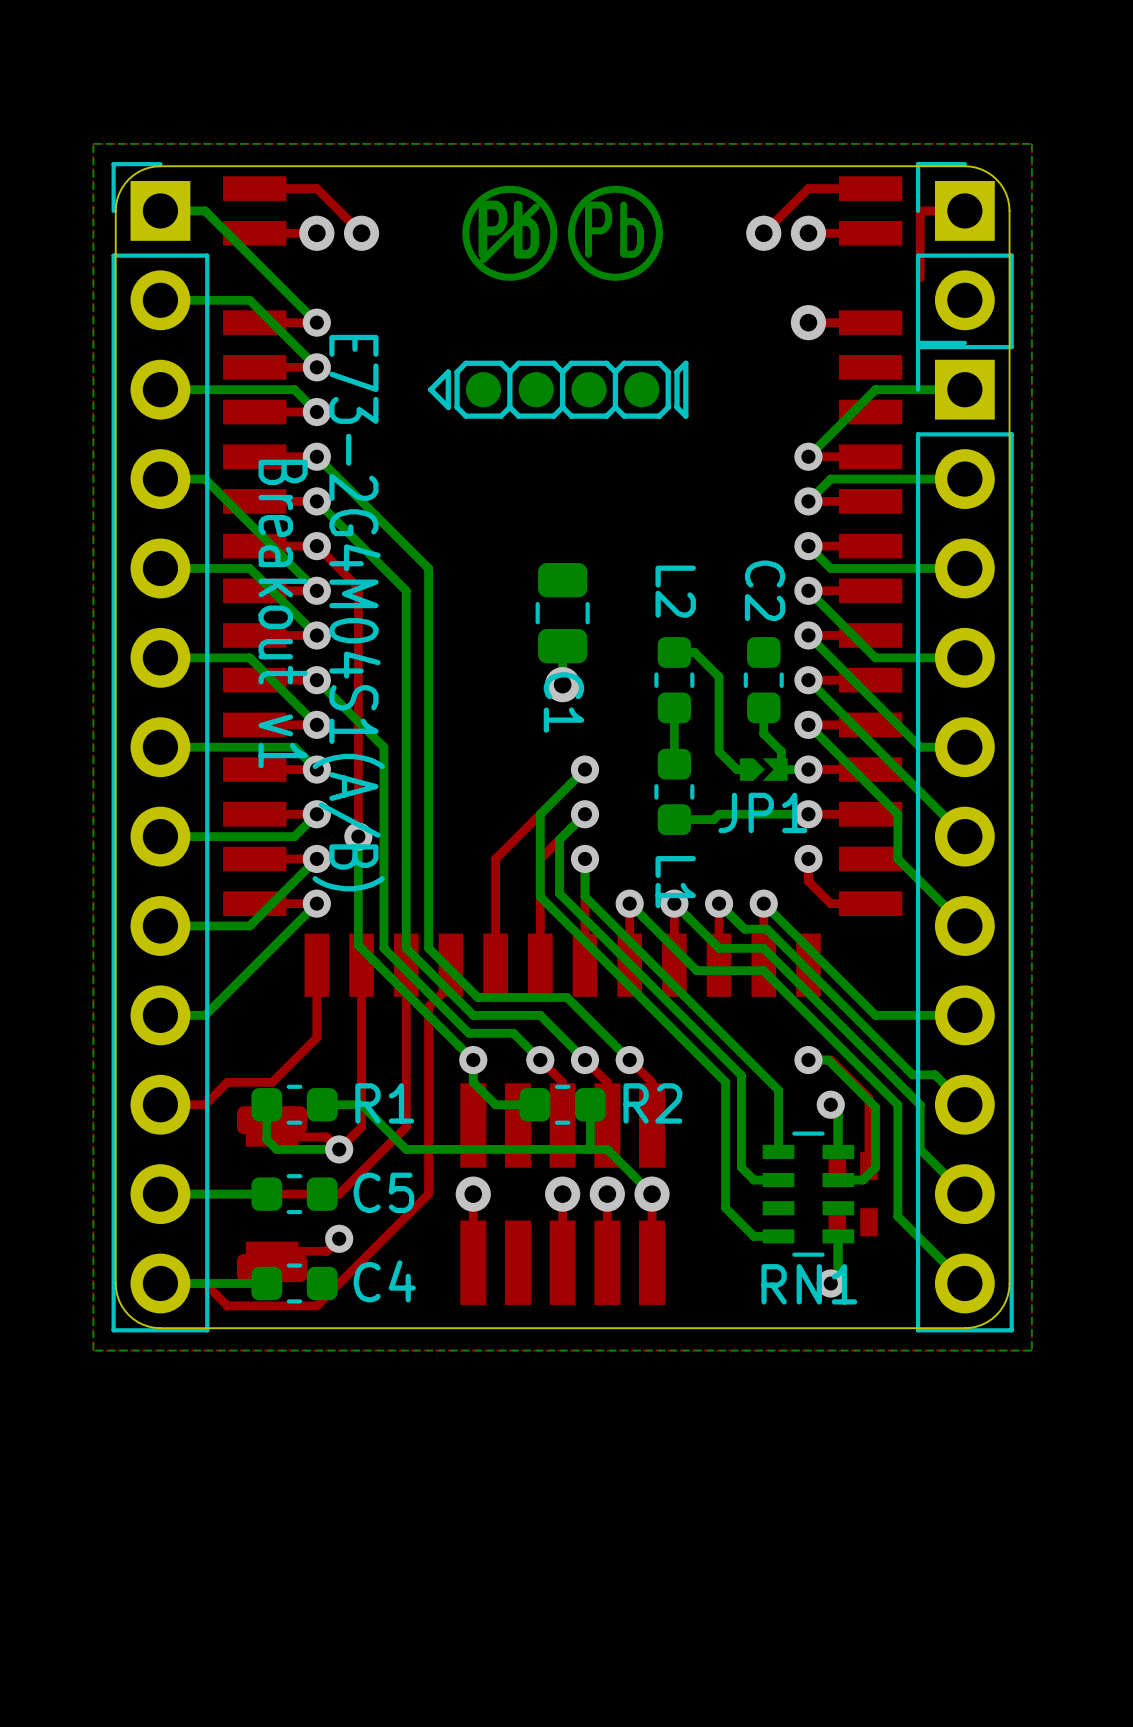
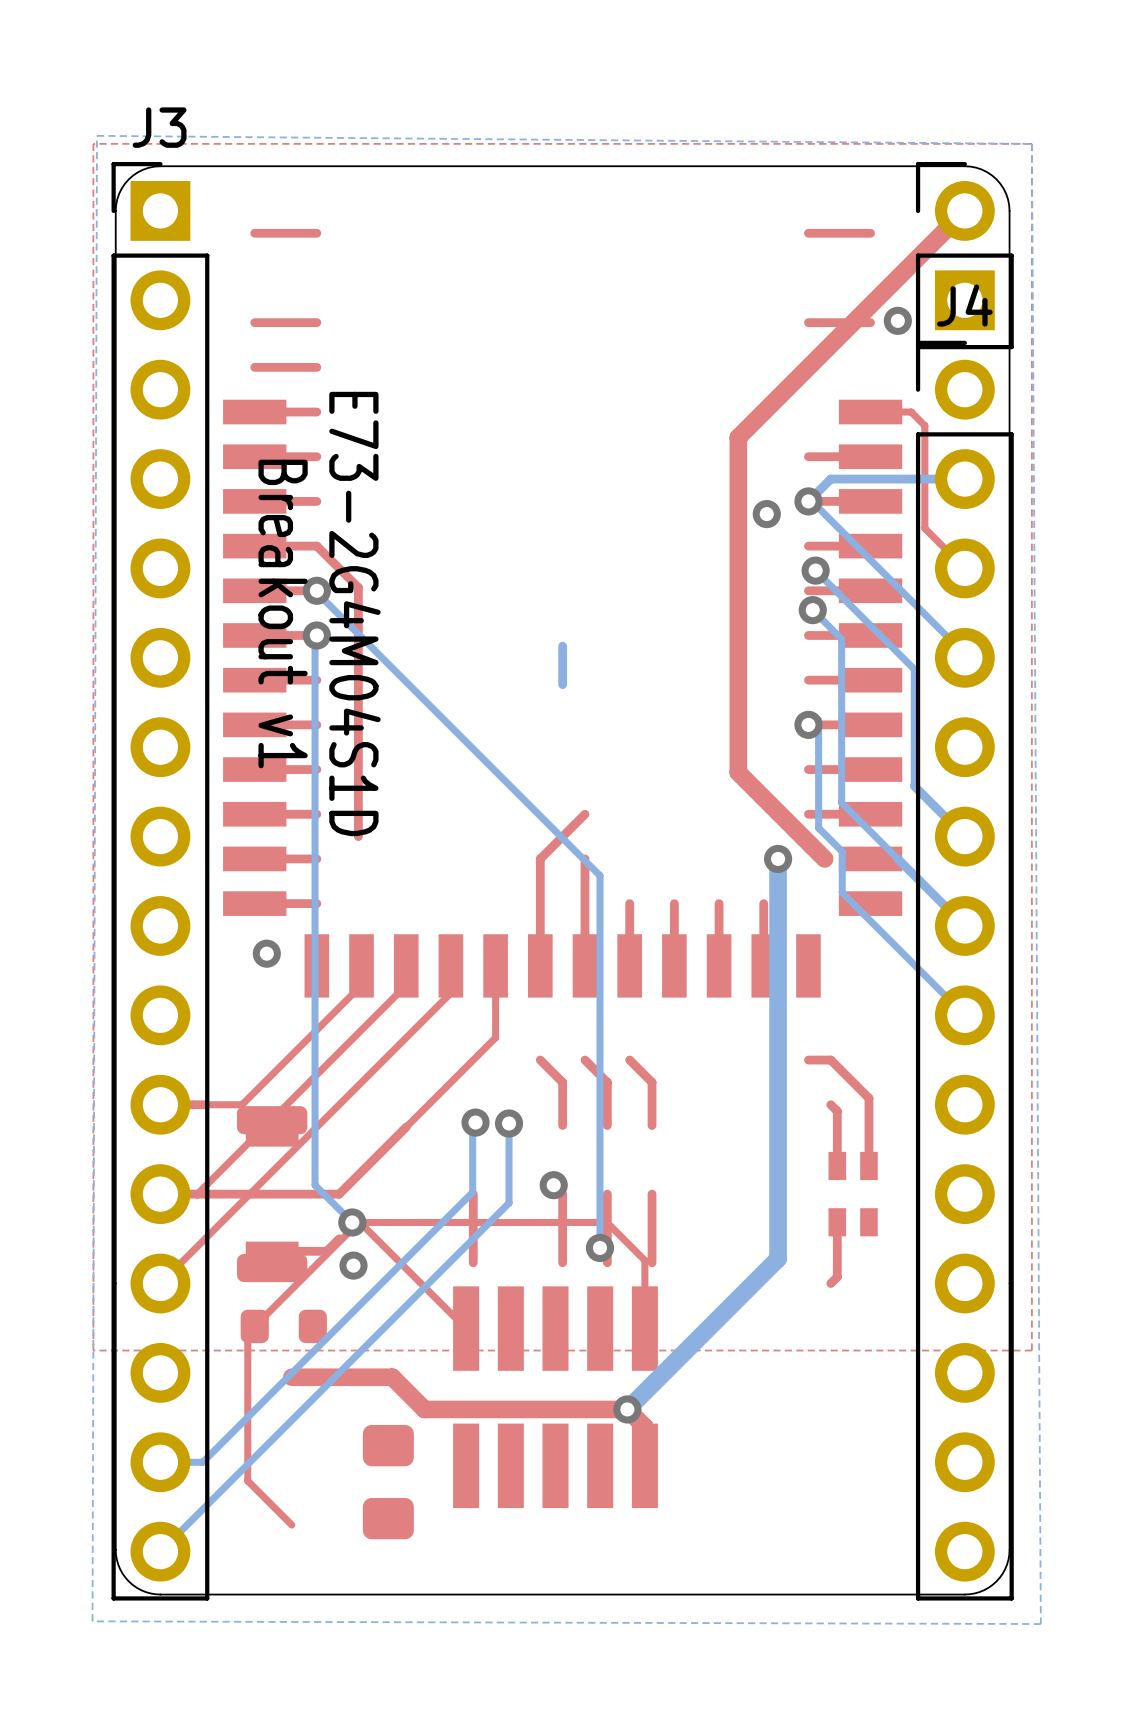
bottom zone outline: (1031, 143) (1031, 1350) (93, 1350) (93, 143) (1031, 143) -> (96, 135) (1031, 143) (1040, 1624) (92, 1621) (96, 135)
part footprint: [915, 162, 1014, 350] -> [915, 162, 1014, 350]
drawing: [462, 185, 663, 281] -> none
top track: (254, 188) (316, 188) (361, 233) -> none
top track: (870, 188) (808, 188) (763, 233) -> none
bottom track: (160, 210) (205, 210) (316, 322) -> none
top track: (964, 210) (920, 210) (920, 277) -> (964, 210) (738, 437) (738, 772) (824, 858)
via: (316, 233) -> none
via: (361, 233) -> none
via: (763, 233) -> none
via: (808, 233) -> none
bottom track: (160, 300) (249, 300) (316, 367) -> none
via: none -> (897, 320)
via: (316, 322) -> none
via: (808, 322) -> none
drawing: [428, 360, 689, 419] -> none
via: (316, 367) -> none
bottom track: (160, 389) (294, 389) (316, 412) -> none
bottom track: (964, 389) (875, 389) (808, 456) -> none
via: (316, 412) -> none
top track: none -> (870, 412) (911, 412) (924, 425) (924, 528) (964, 568)
bottom track: (316, 456) (428, 568) (428, 948) (477, 997) (567, 997) (629, 1060) -> none
via: (316, 456) -> none
via: (808, 456) -> none
bottom track: (160, 479) (205, 479) (316, 590) -> none
bottom track: (316, 501) (406, 590) (406, 948) (473, 1015) (540, 1015) (584, 1060) -> none
via: (316, 501) -> none
via: none -> (766, 514)
via: (316, 546) -> none
bottom track: (808, 546) (830, 568) (964, 568) -> none
via: (808, 546) -> none
bottom track: (160, 568) (249, 568) (316, 635) -> none
via: none -> (815, 570)
part: (562, 586) -> none
bottom track: none -> (315, 590) (599, 875) (599, 1247)
bottom track: (808, 590) (875, 657) (964, 657) -> (818, 507) (964, 654) (964, 657)
via: (808, 590) -> none
via: none -> (812, 610)
text: E73-2G4M04S1(A/B) (348, 613) -> E73-2G4M04S1D (354, 613)
C1: (562, 613) -> none
bottom track: none -> (315, 635) (315, 1185) (352, 1222)
bottom track: (808, 635) (920, 747) (964, 747) -> none
via: (808, 635) -> none
bottom track: (674, 652) (694, 652) (719, 676) (719, 751) (736, 769) (751, 769) -> none
bottom track: (160, 657) (249, 657) (316, 724) -> none
bottom track: (316, 680) (383, 747) (383, 948) (468, 1033) (513, 1033) (540, 1060) -> none
via: (316, 680) -> none
L2: (674, 680) -> none
C2: (763, 680) -> none
bottom track: (808, 680) (914, 786) -> (815, 570) (914, 669) (914, 786)
via: (808, 680) -> none
via: (562, 684) -> none
part: none -> (562, 698)
bottom track: (674, 707) (674, 764) -> none
bottom track: (763, 707) (763, 733) (781, 751) (781, 769) (808, 769) -> none
via: (316, 724) -> none
bottom track: (808, 724) (897, 814) (897, 858) -> (812, 610) (841, 639) (841, 802) (897, 858)
bottom track: (160, 747) (294, 747) (316, 769) -> none
part: (160, 747) -> none
via: (316, 769) -> none
top track: (584, 769) (495, 858) (495, 965) -> none
bottom track: (584, 769) (540, 814) (540, 896) (725, 1082) (725, 1208) (753, 1236) (778, 1236) -> none
via: (584, 769) -> none
JP1: (763, 769) -> none
via: (808, 769) -> none
L1: (674, 791) -> none
bottom track: (316, 814) (294, 836) (160, 836) -> none
via: (316, 814) -> none
bottom track: (584, 814) (559, 839) (559, 893) (741, 1075) (741, 1167) (753, 1180) (778, 1180) -> none
via: (584, 814) -> none
bottom track: (808, 814) (719, 814) (713, 819) (674, 819) -> none
via: (808, 814) -> none
bottom track: (358, 836) (358, 945) (473, 1060) (473, 1082) (495, 1104) (534, 1104) -> none
via: (358, 836) -> none
part: (964, 836) -> none
bottom track: (316, 858) (249, 925) (160, 925) -> none
via: (316, 858) -> none
bottom track: (584, 858) (584, 896) (778, 1090) (778, 1151) -> none
via: (584, 858) -> none
bottom track: none -> (778, 858) (778, 1258) (627, 1409)
via: none -> (778, 858)
top track: (808, 858) (808, 881) (830, 903) (870, 903) -> none
via: (808, 858) -> none
J3: none -> (160, 881)
bottom track: (316, 903) (205, 1015) (160, 1015) -> none
via: (316, 903) -> none
bottom track: (629, 903) (696, 970) (763, 970) (897, 1104) (897, 1216) (964, 1283) -> none
via: (629, 903) -> none
bottom track: (674, 903) (719, 948) (763, 948) (920, 1104) (920, 1149) (964, 1194) -> none
via: (674, 903) -> none
bottom track: (719, 903) (744, 929) (766, 929) (912, 1074) (934, 1074) (964, 1104) -> none
via: (719, 903) -> none
bottom track: (763, 903) (875, 1015) (964, 1015) -> (818, 719) (818, 828) (842, 851) (842, 892) (964, 1015)
via: (763, 903) -> none
via: none -> (266, 953)
top track: (316, 965) (316, 1037) (272, 1082) (227, 1082) (205, 1104) -> (361, 985) (242, 1104) (205, 1104)
J4: none -> (964, 970)
top track: (450, 984) (428, 1006) (428, 1194) (316, 1305) (227, 1305) (205, 1283) (160, 1283) -> (450, 984) (450, 993) (160, 1283)
top track: (361, 985) (361, 1127) (339, 1149) (326, 1136) (272, 1136) (272, 1120) -> none
top track: (406, 985) (406, 1127) -> (495, 965) (495, 1037) (406, 1127)
top track: none -> (406, 985) (197, 1194)
via: (473, 1060) -> none
via: (540, 1060) -> none
via: (584, 1060) -> none
via: (629, 1060) -> none
bottom track: (808, 1060) (828, 1060) (875, 1107) (875, 1167) (862, 1180) (838, 1180) -> none
via: (808, 1060) -> none
bottom track: (266, 1104) (266, 1139) (276, 1149) (339, 1149) -> none
R1: (294, 1104) -> none
bottom track: (322, 1104) (361, 1104) (406, 1149) (607, 1149) (652, 1194) -> none
R2: (562, 1104) -> none
bottom track: (590, 1104) (589, 1149) -> none
bottom track: (830, 1104) (838, 1112) (838, 1151) -> none
via: (830, 1104) -> none
bottom track: none -> (475, 1122) (472, 1125) (472, 1192) (202, 1462) (160, 1462)
via: none -> (475, 1122)
bottom track: none -> (509, 1123) (509, 1203) (160, 1551)
via: none -> (509, 1123)
via: (339, 1149) -> none
via size: [545, 1176, 581, 1212] -> [539, 1171, 568, 1200]
bottom track: (266, 1194) (160, 1194) -> none
C5: (294, 1194) -> none
via: (473, 1194) -> none
part position: (562, 1194) -> (555, 1397)
via: (607, 1194) -> none
via: (652, 1194) -> none
RN1: (808, 1194) -> none
via: none -> (352, 1222)
top track: none -> (360, 1222) (466, 1328)
bottom track: (838, 1236) (838, 1275) (830, 1283) -> none
via: (339, 1238) -> none
via: none -> (599, 1247)
via: none -> (353, 1265)
bottom track: (266, 1283) (160, 1283) -> none
C4: (294, 1283) -> none
via: (830, 1283) -> none
board edge: (1009, 1283) (1006, 1300) (996, 1315) (981, 1324) (964, 1328) (160, 1328) (143, 1324) (128, 1315) (119, 1300) (115, 1283) -> (1009, 1283) (1009, 1554) (1002, 1573) (992, 1584) (979, 1592) (964, 1594) (160, 1594) (145, 1592) (136, 1587) (125, 1577) (120, 1569) (116, 1554) (115, 1283)
part: none -> (283, 1326)
top track: none -> (644, 1328) (644, 1260) (606, 1222) (352, 1222) (352, 1228) (247, 1333) (247, 1480) (291, 1525)
top track: none -> (291, 1377) (392, 1377) (424, 1409) (627, 1409) (644, 1426) (644, 1465)
via: none -> (627, 1409)
part: none -> (388, 1482)

